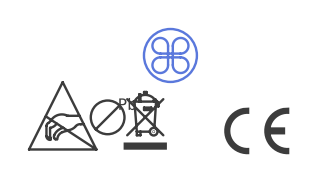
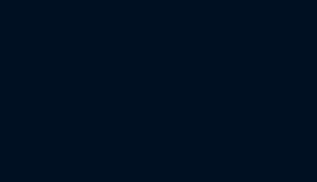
drawing: [27, 27, 199, 151] -> none
drawing: [224, 107, 290, 155] -> none

